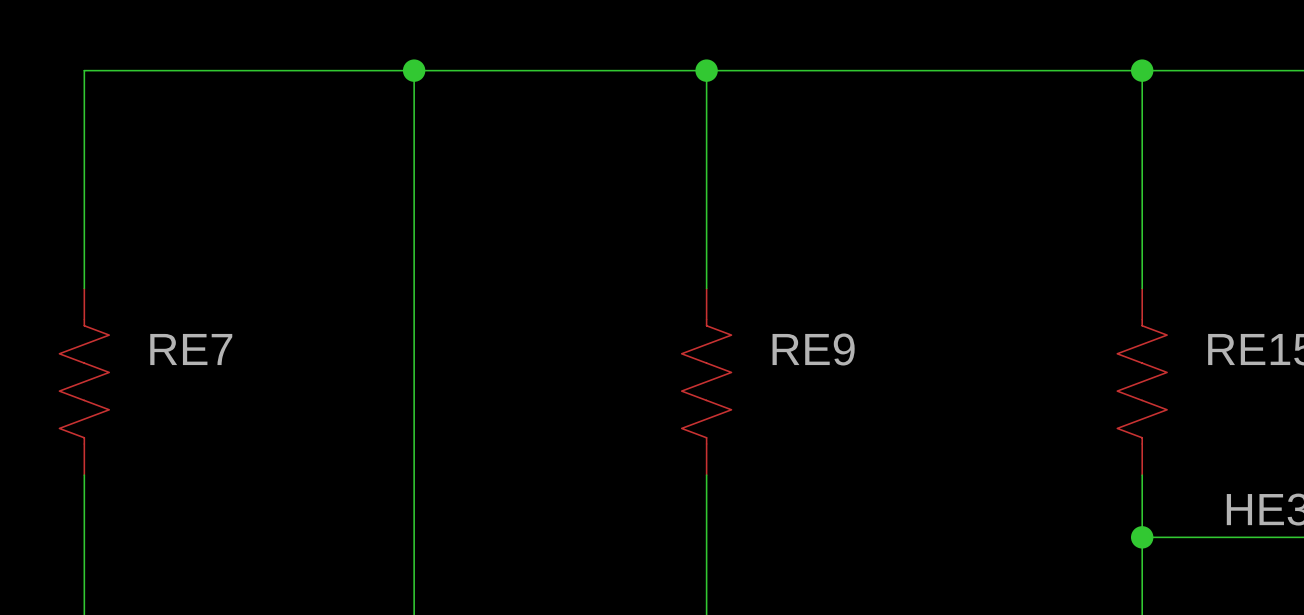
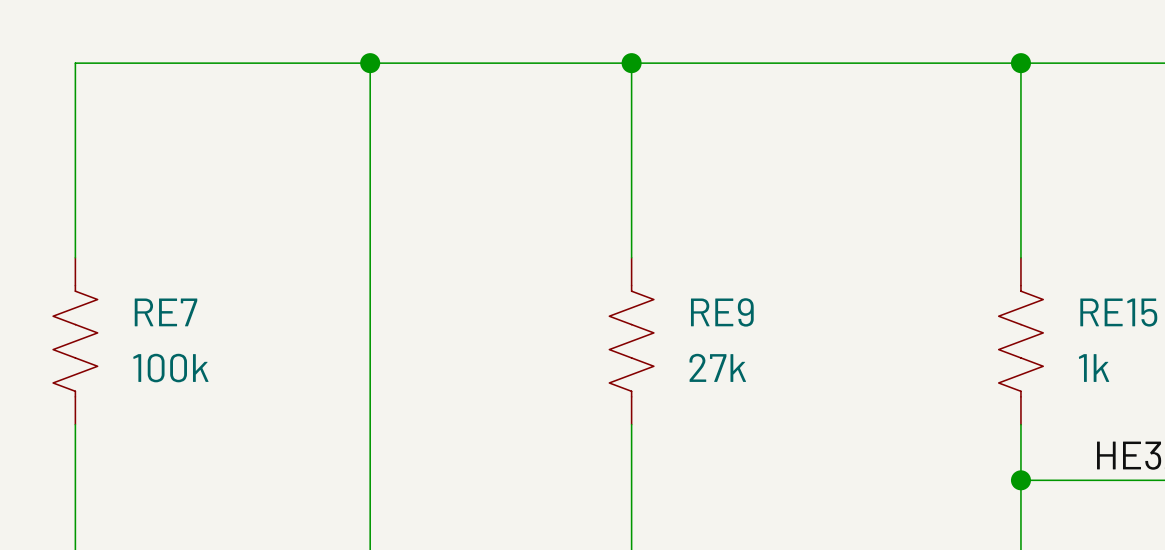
RE9 value: none -> 27k (717, 367)
RE15 value: none -> 1k (1094, 368)
RE7 value: none -> 100k (170, 368)

